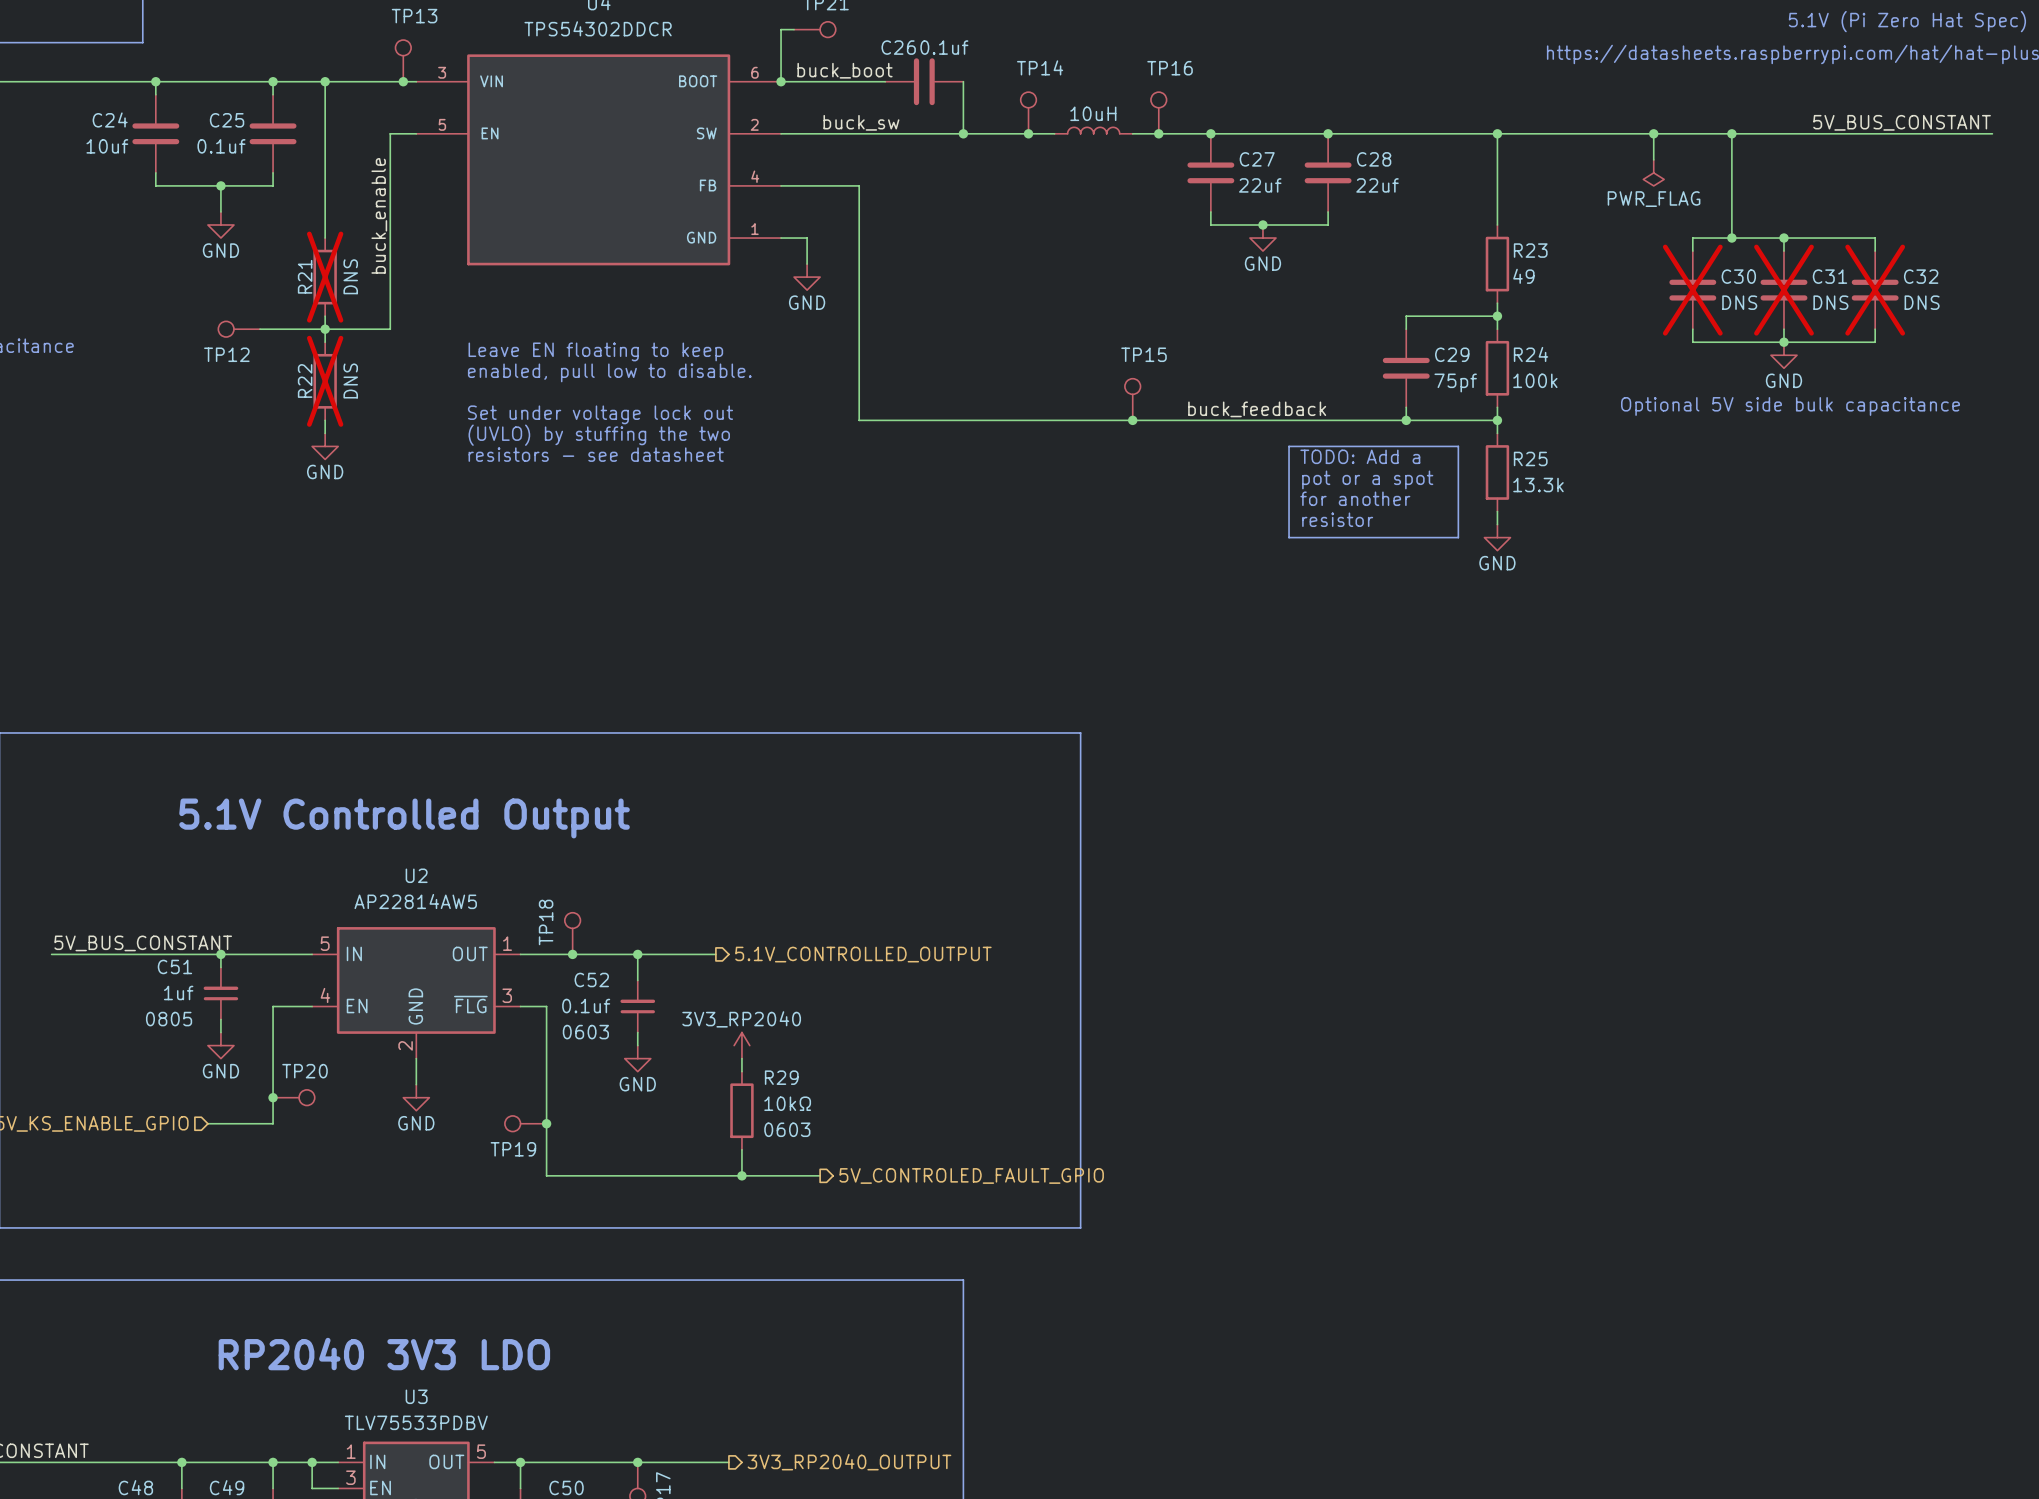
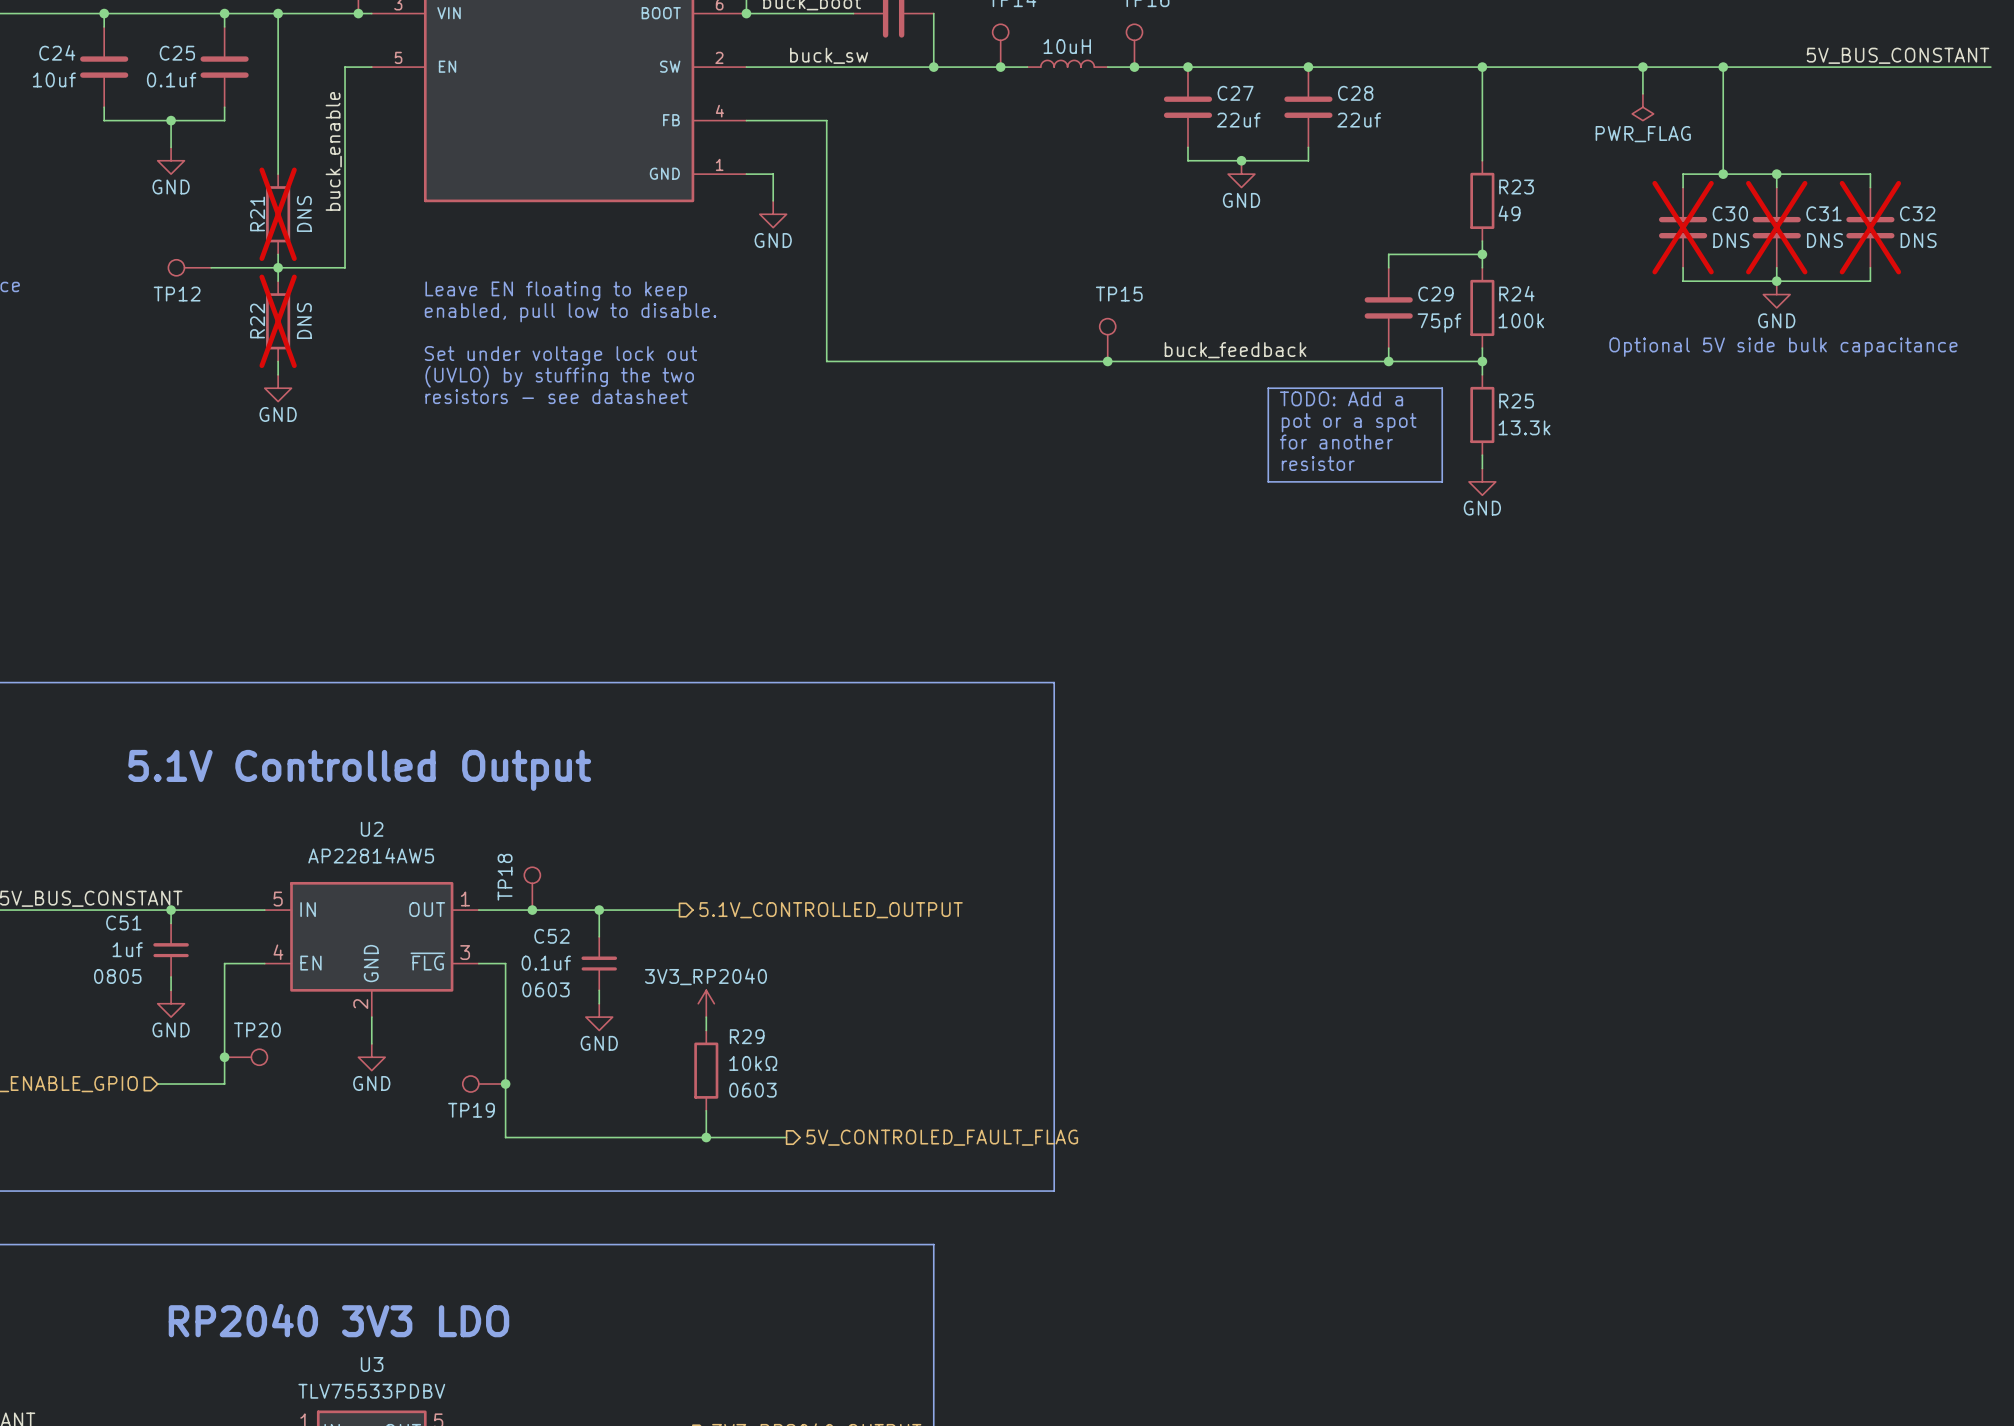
hierarchical label: 5V_CONTROLED_FAULT_GPIO (971, 1175) -> 5V_CONTROLED_FAULT_FLAG (942, 1137)

